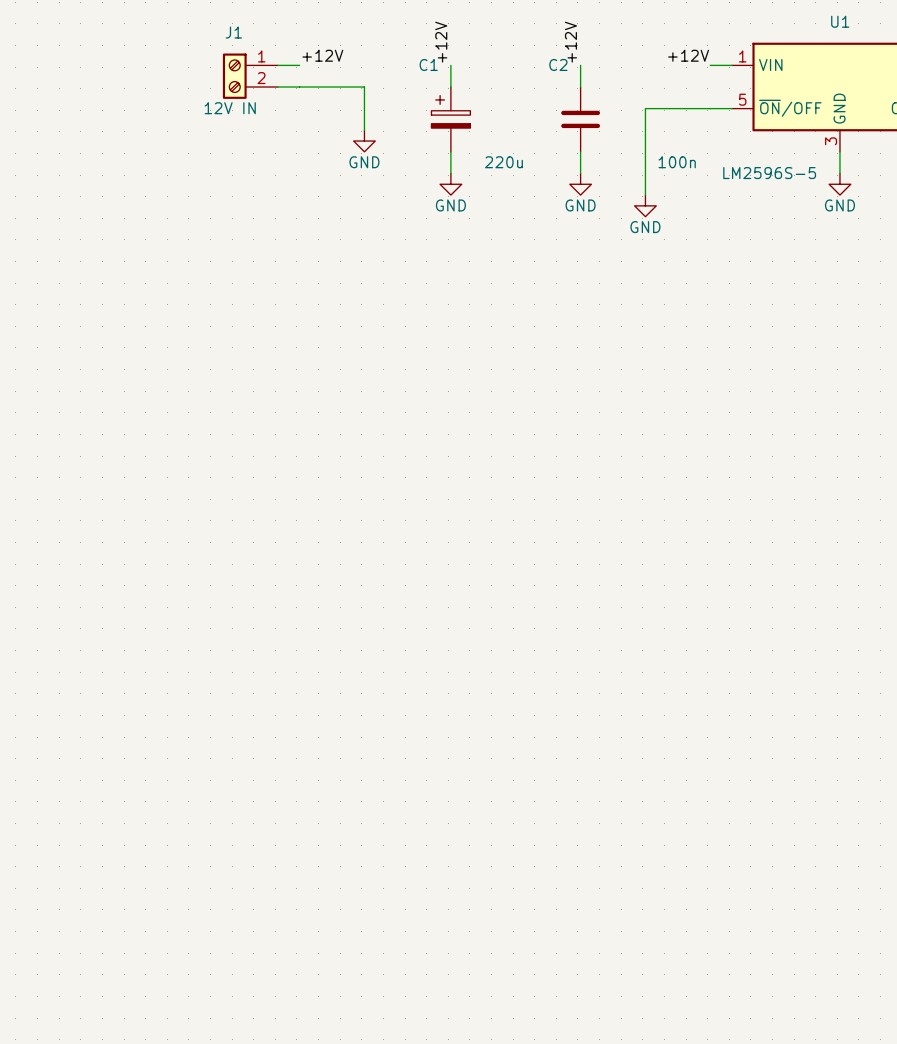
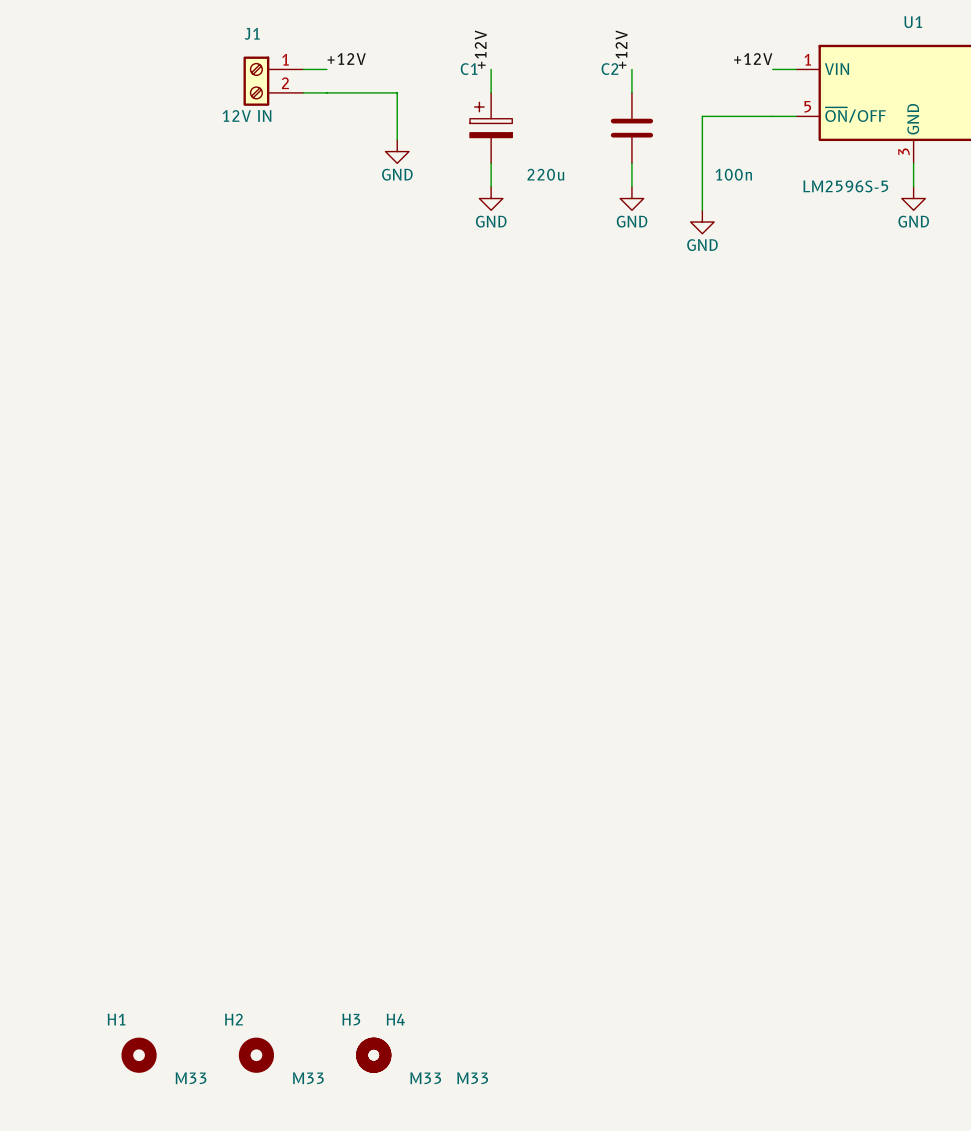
H1: none -> M33 (139, 1055)
H2: none -> M33 (256, 1055)
H3: none -> M33 (373, 1055)
H4: none -> M33 (373, 1055)

